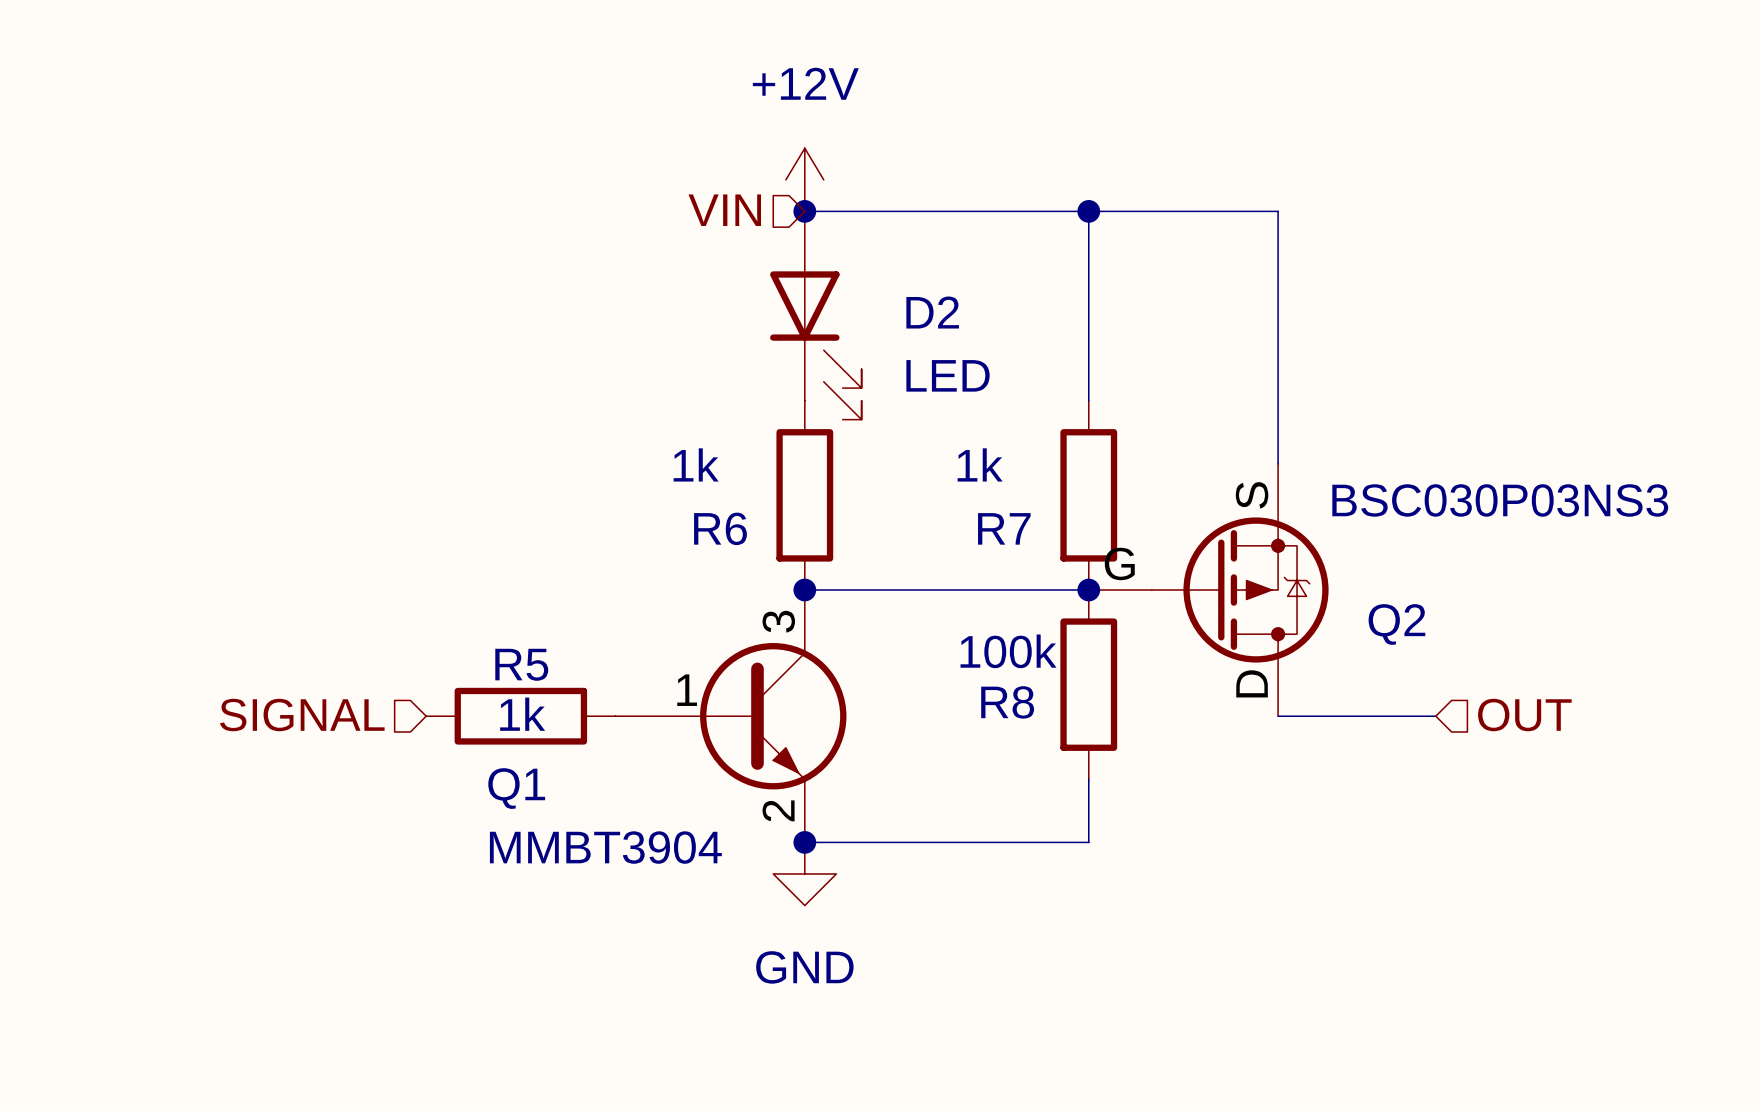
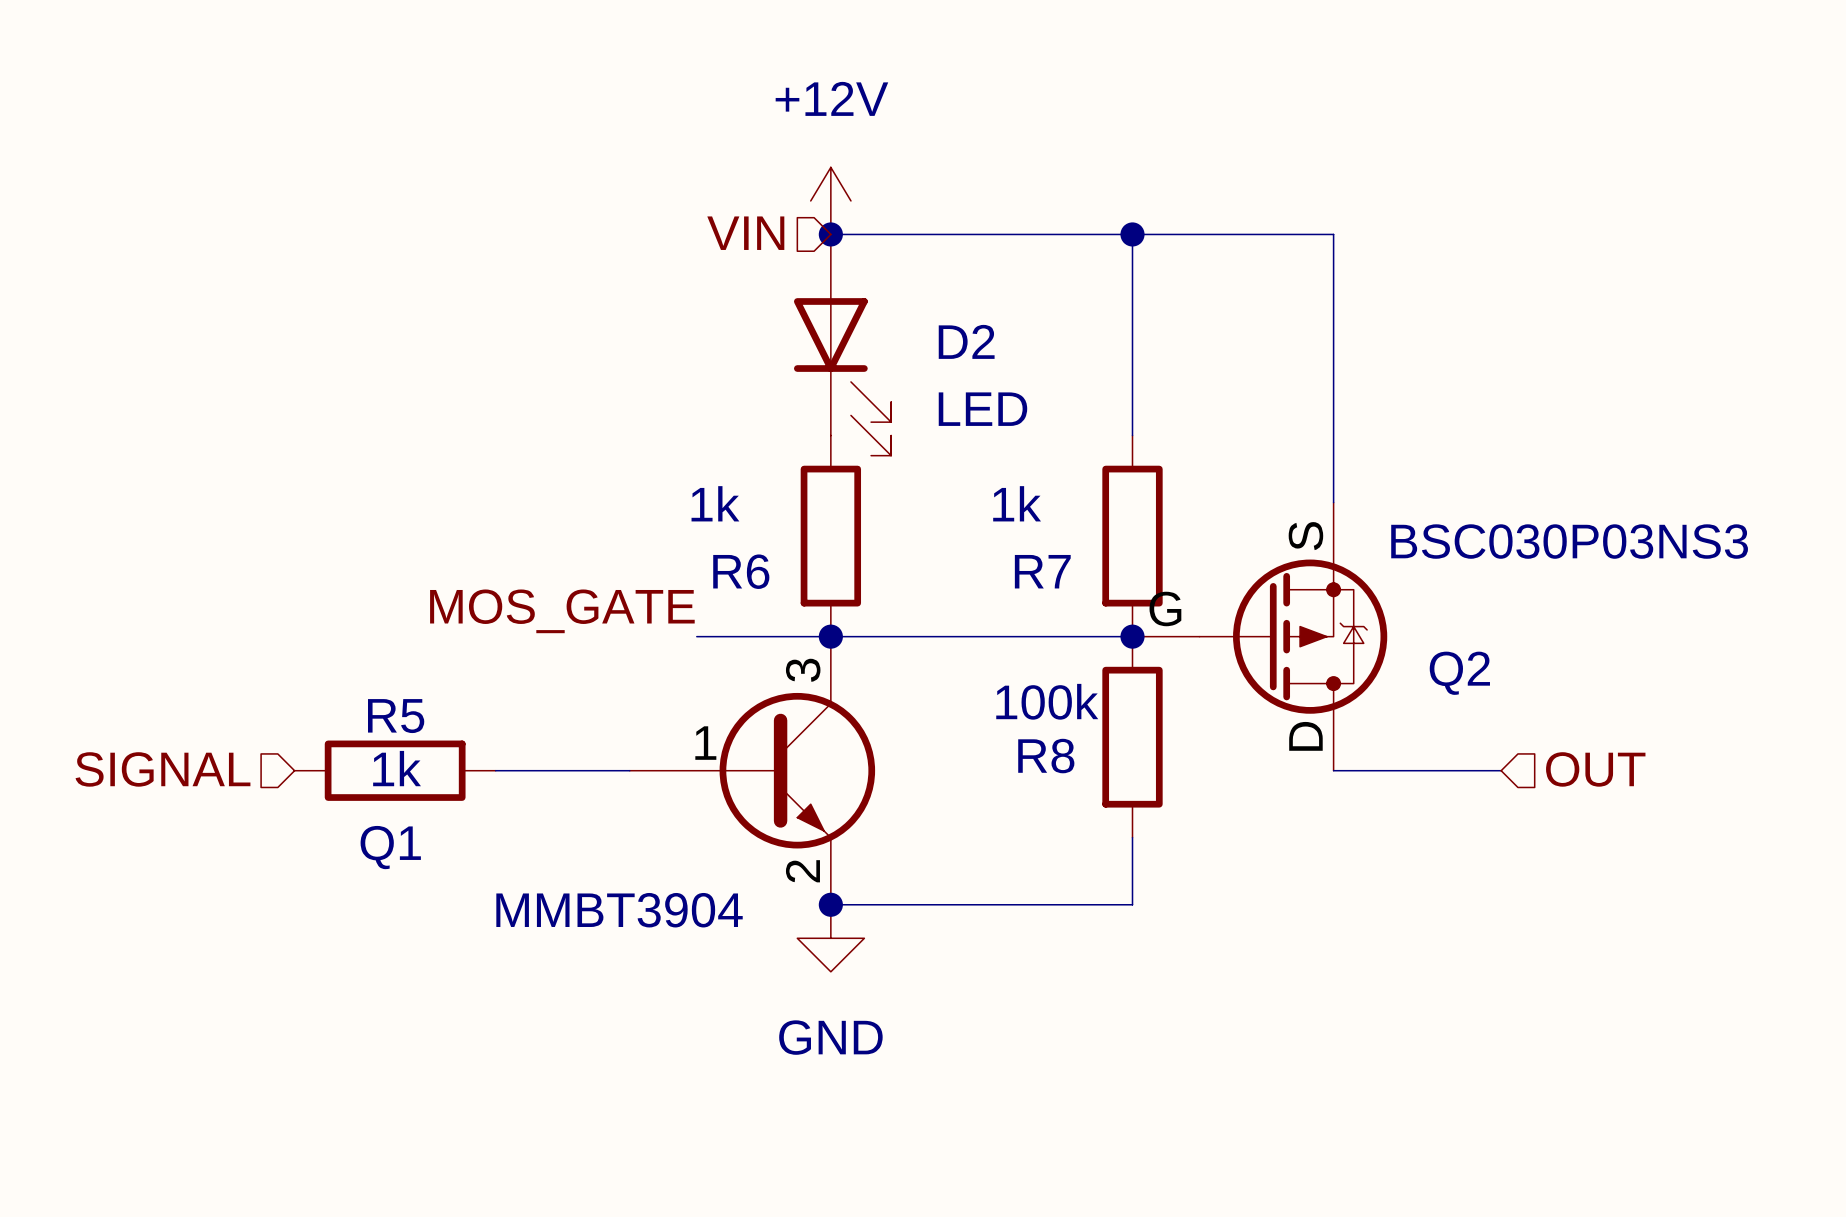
label: none -> MOS_GATE (562, 611)
wire: none -> (696, 636) (830, 636)
hierarchical label position: SIGNAL (302, 715) -> SIGNAL (162, 769)
wire: none -> (495, 770) (629, 770)
R5 position: (520, 716) -> (395, 770)
Q1 name position: Q1 (516, 788) -> Q1 (390, 847)

